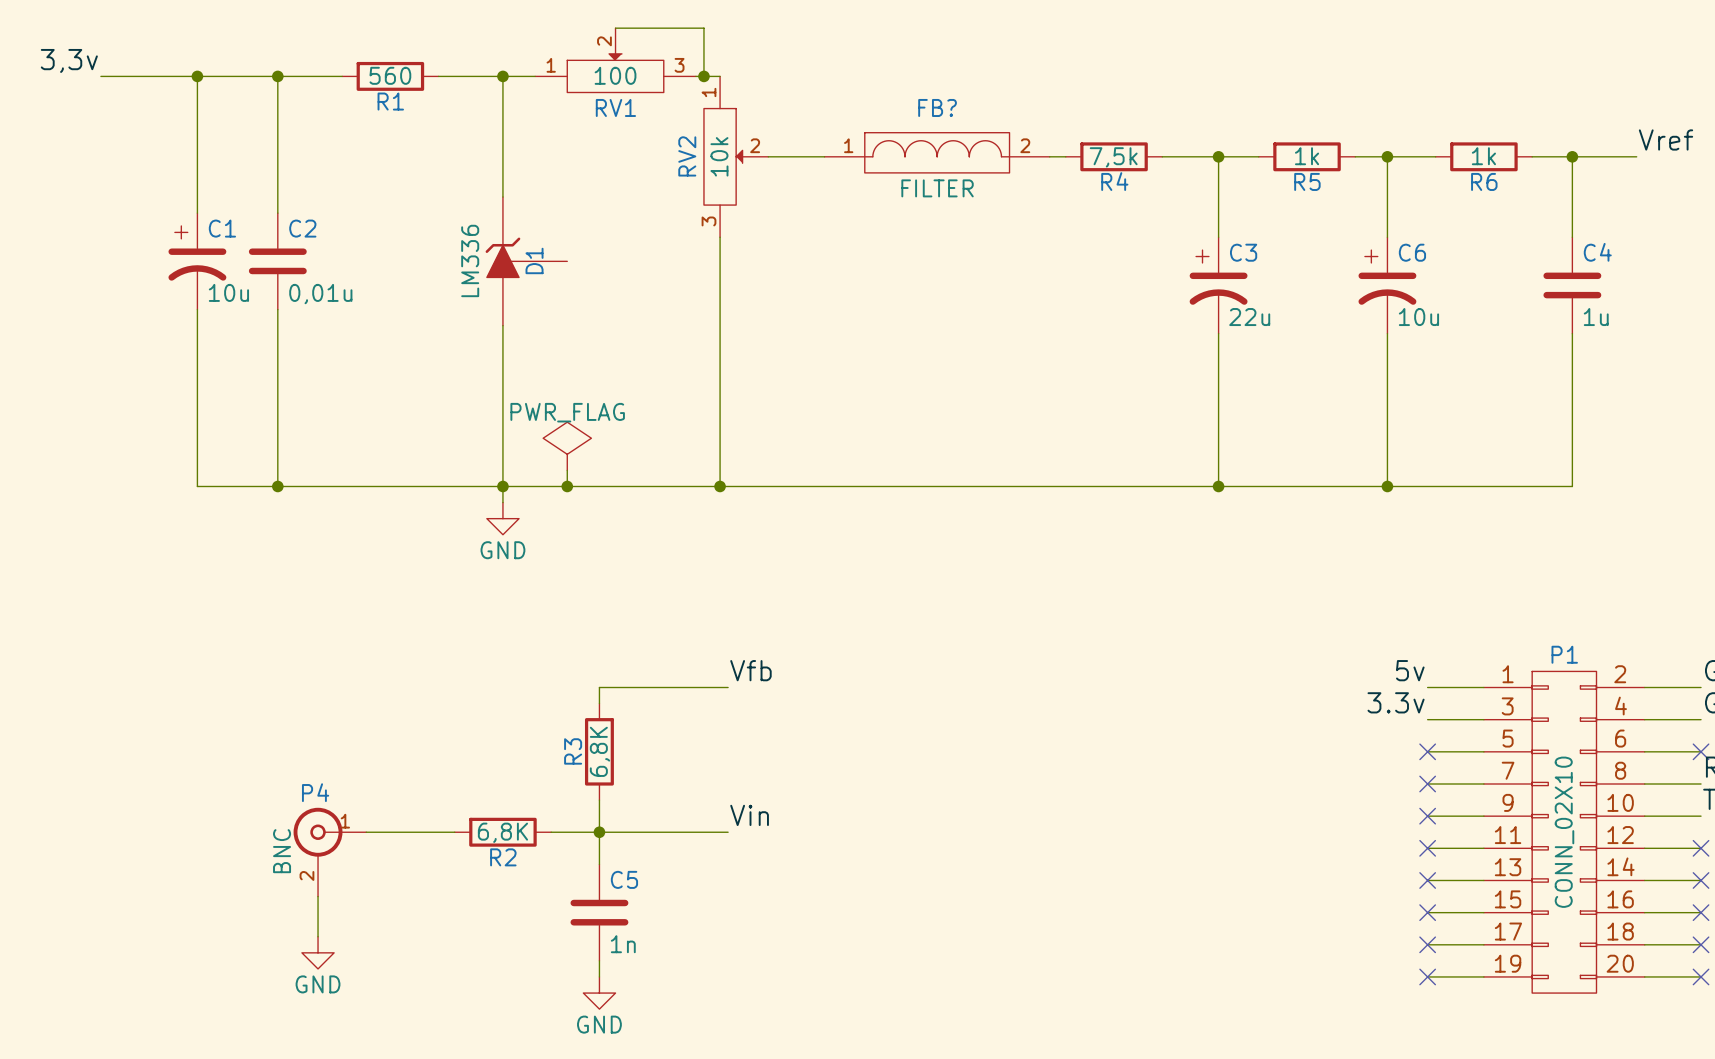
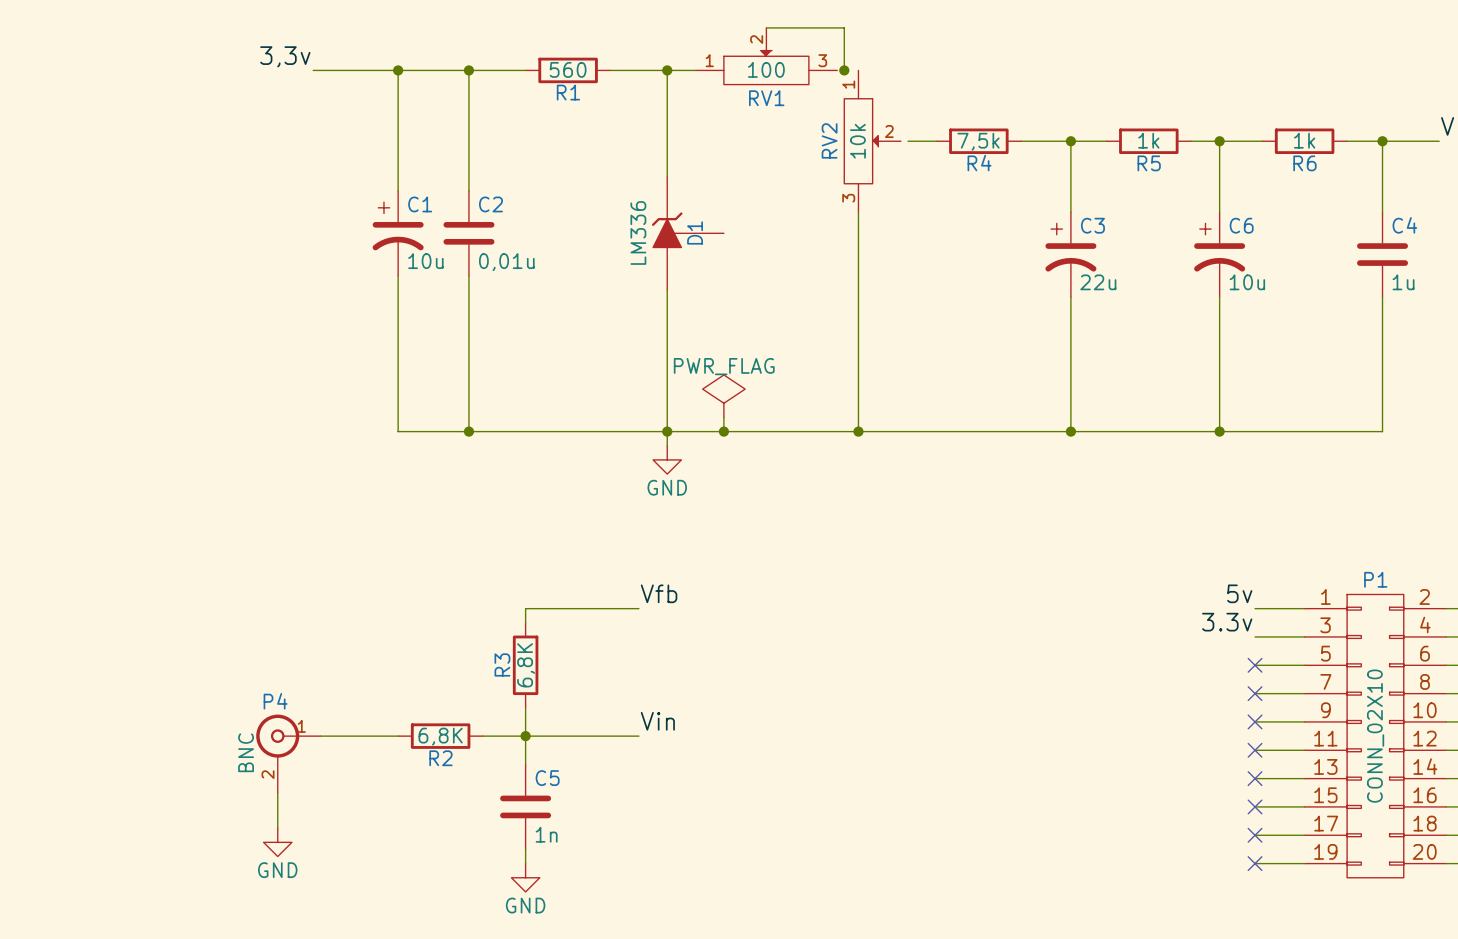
wire: (615, 28) (703, 28) (703, 76) -> (766, 27) (844, 27) (844, 70)
label position: 3,3v (69, 60) -> 3,3v (285, 56)
RV1 position: (615, 60) -> (766, 56)
wire: (100, 76) (342, 76) -> none
wire: (197, 76) (197, 213) -> (398, 70) (398, 190)
junction: (197, 76) -> none
wire: (277, 76) (277, 213) -> none
junction: (277, 76) -> none
wire: none -> (313, 70) (383, 70)
R1 position: (390, 76) -> (568, 70)
junction: none -> (398, 70)
wire: (502, 76) (502, 197) -> (667, 70) (667, 176)
junction: (502, 76) -> none
junction: none -> (468, 70)
wire: none -> (525, 70) (468, 70) (468, 190)
junction position: (703, 76) -> (667, 70)
wire: none -> (631, 70) (695, 70)
junction: none -> (844, 70)
FB?: FILTER (937, 152) -> none
RV2 position: (736, 156) -> (872, 141)
wire: (768, 156) (824, 156) -> none
wire: (720, 237) (720, 486) -> (858, 212) (858, 431)
C1 position: (197, 261) -> (398, 233)
C2 position: (277, 261) -> (468, 233)
D1 position: (526, 261) -> (687, 233)
wire: (197, 309) (197, 486) (454, 486) -> (398, 275) (398, 431)
wire: (277, 309) (277, 486) -> (468, 275) (468, 431)
wire: (502, 325) (502, 502) -> (667, 289) (667, 445)
power symbol position: PWR_FLAG (567, 446) -> PWR_FLAG (723, 396)
wire: (567, 470) (567, 486) -> (723, 417) (723, 431)
junction: (277, 486) -> none
junction: (502, 486) -> none
junction: none -> (468, 431)
junction: (567, 486) -> none
junction position: (720, 486) -> (667, 431)
junction: none -> (723, 431)
junction: none -> (858, 431)
power symbol position: GND (502, 518) -> GND (667, 459)

